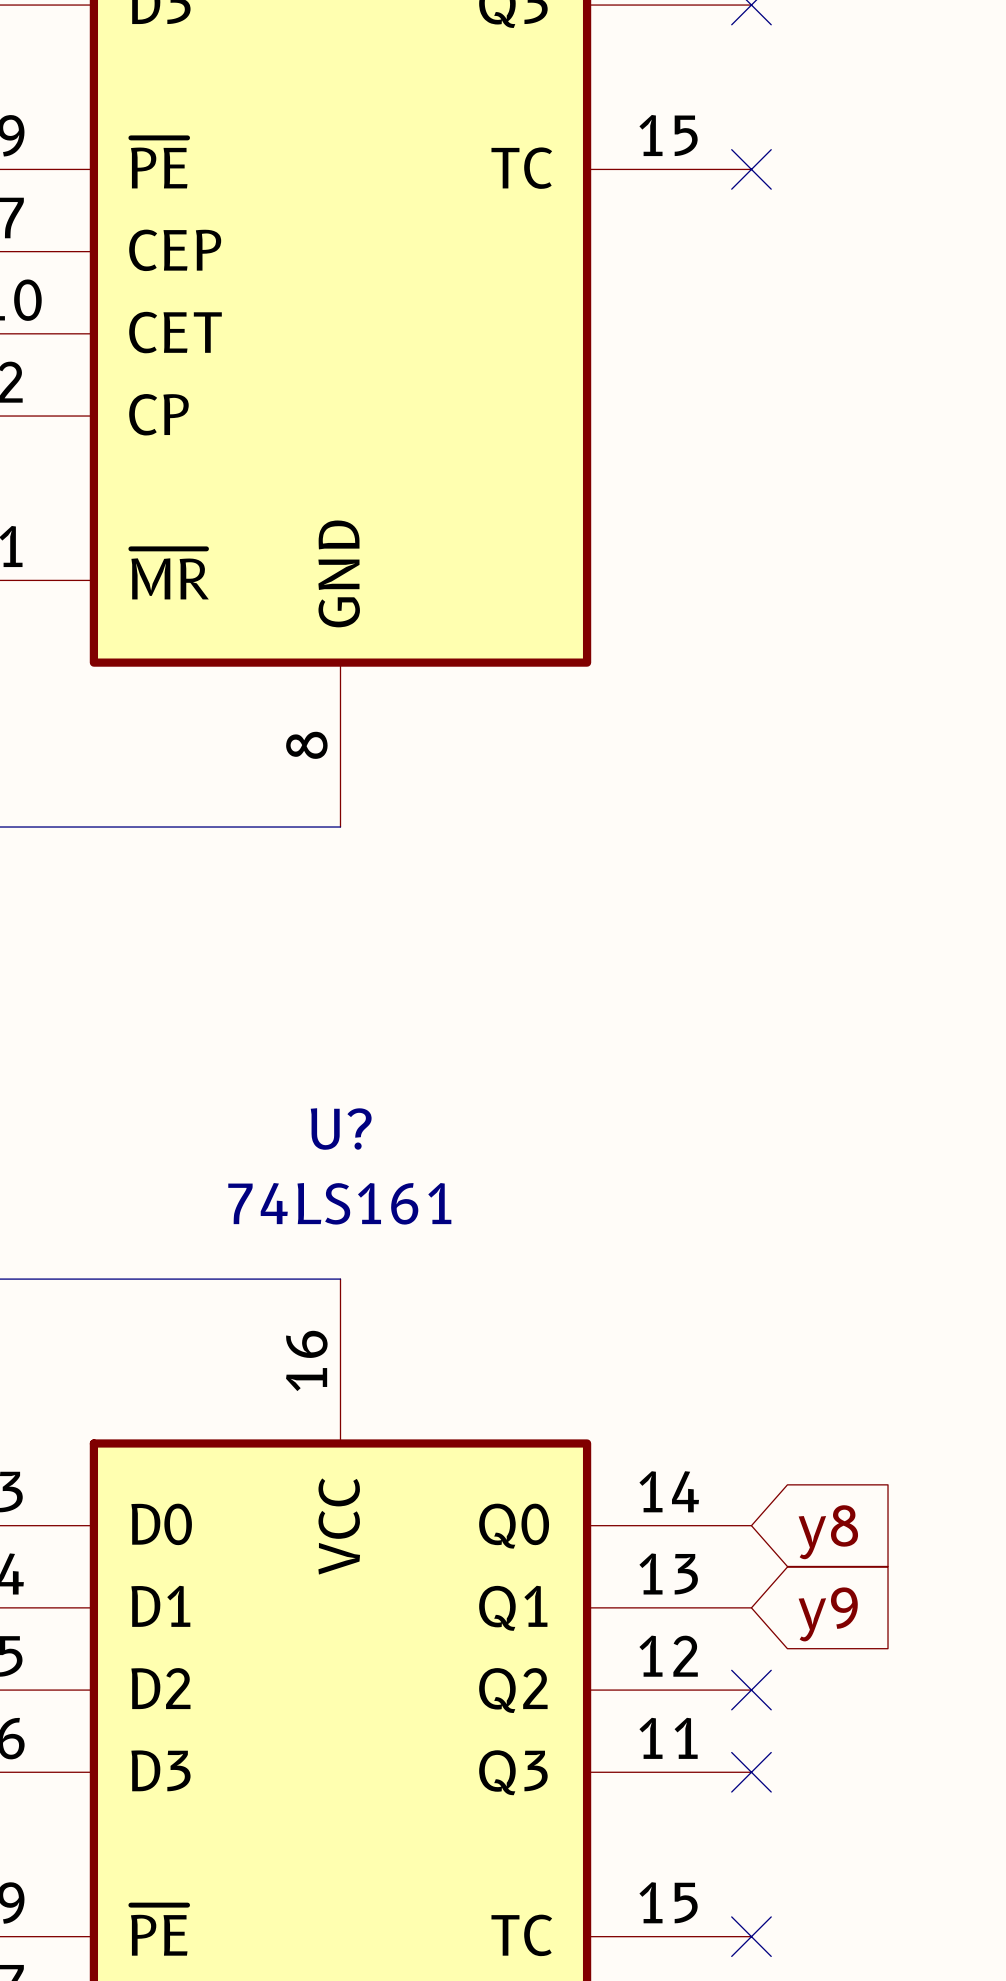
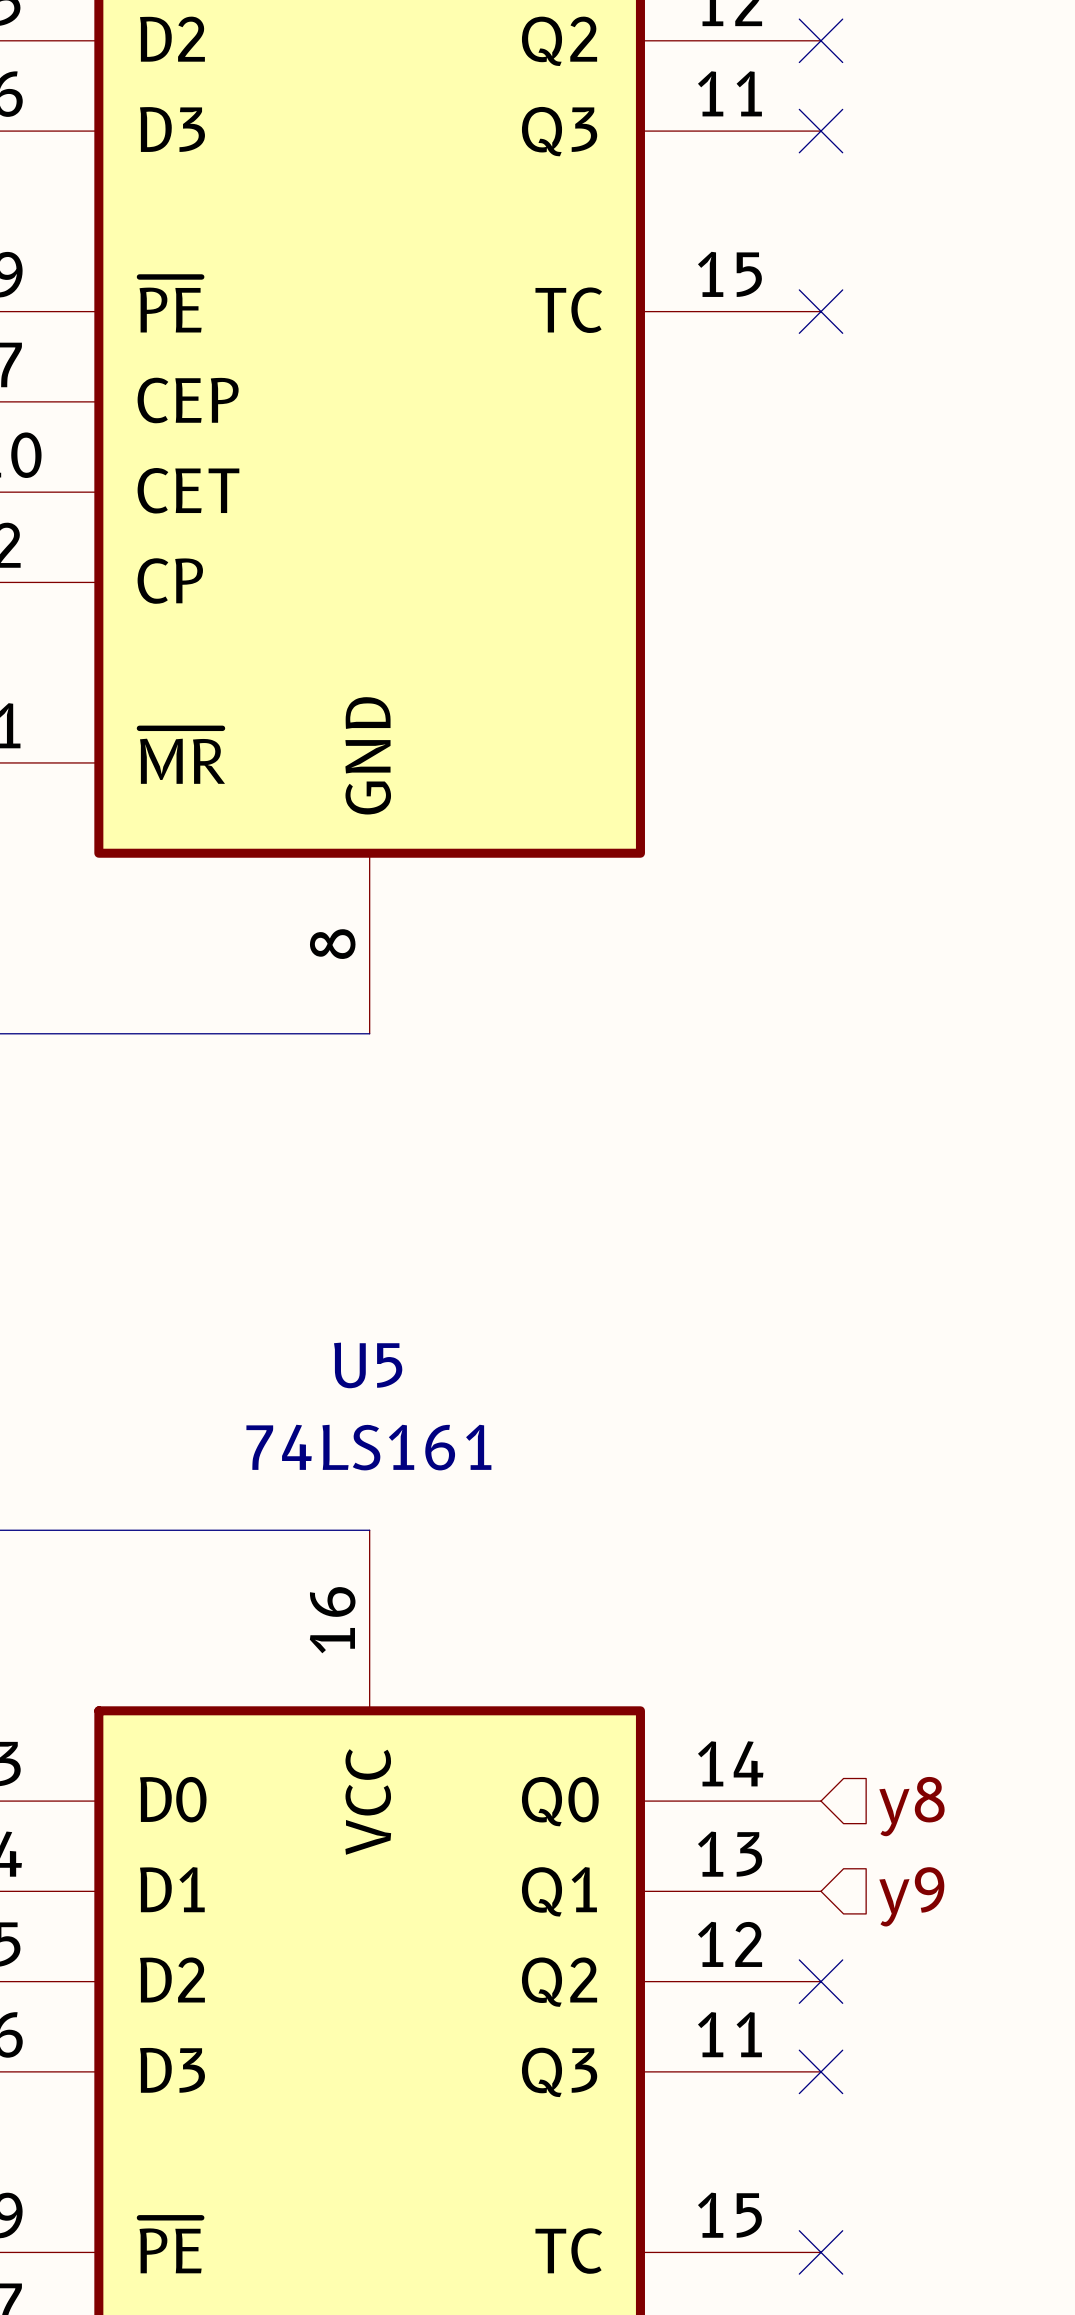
U? name: U? (341, 1129) -> U5 (368, 1365)
hierarchical label: none -> y8 (911, 1806)
global label: y8 (828, 1532) -> none
hierarchical label: none -> y9 (911, 1896)
global label: y9 (828, 1614) -> none

